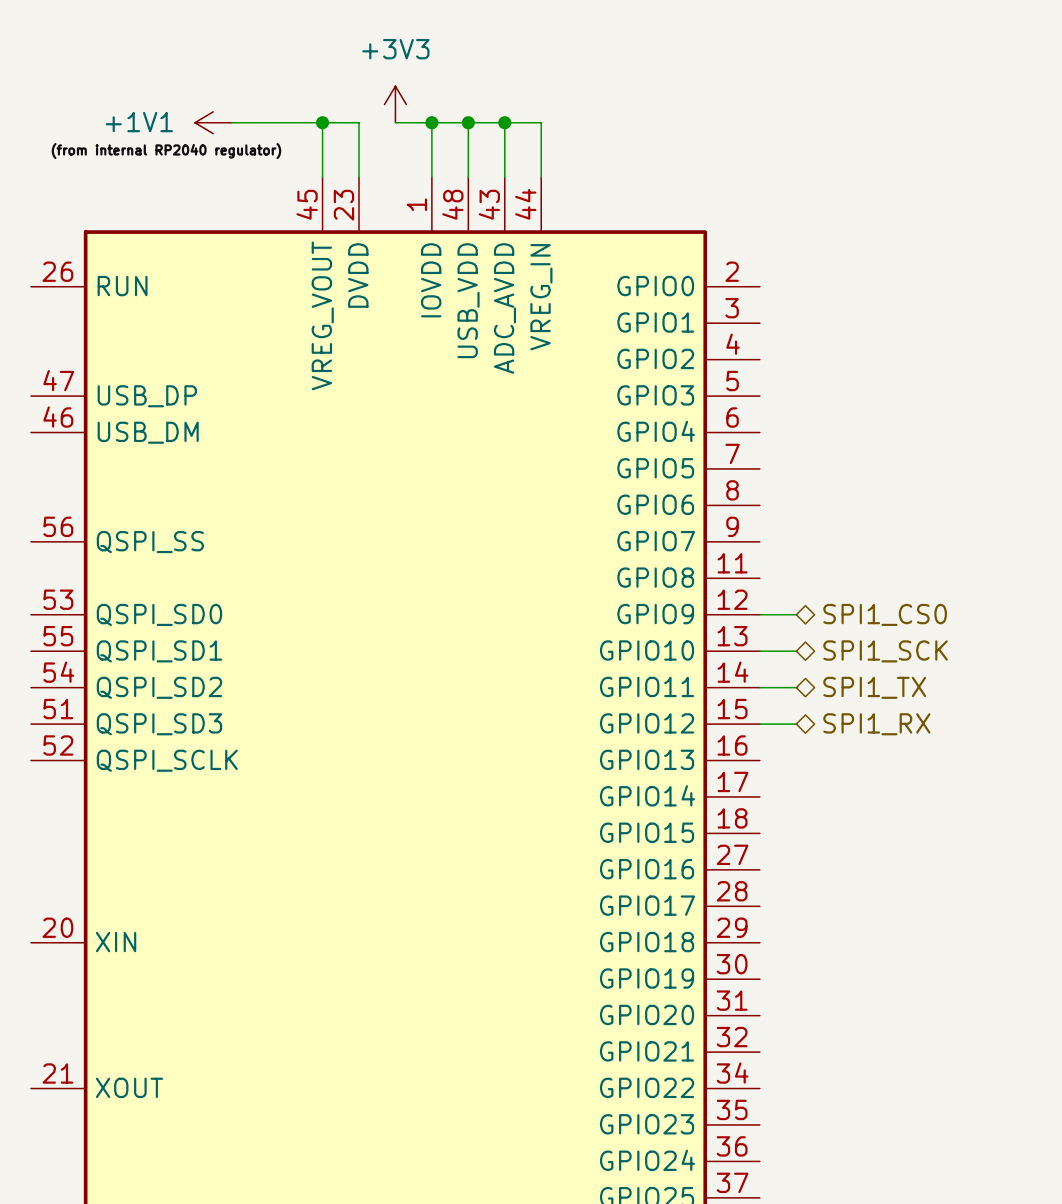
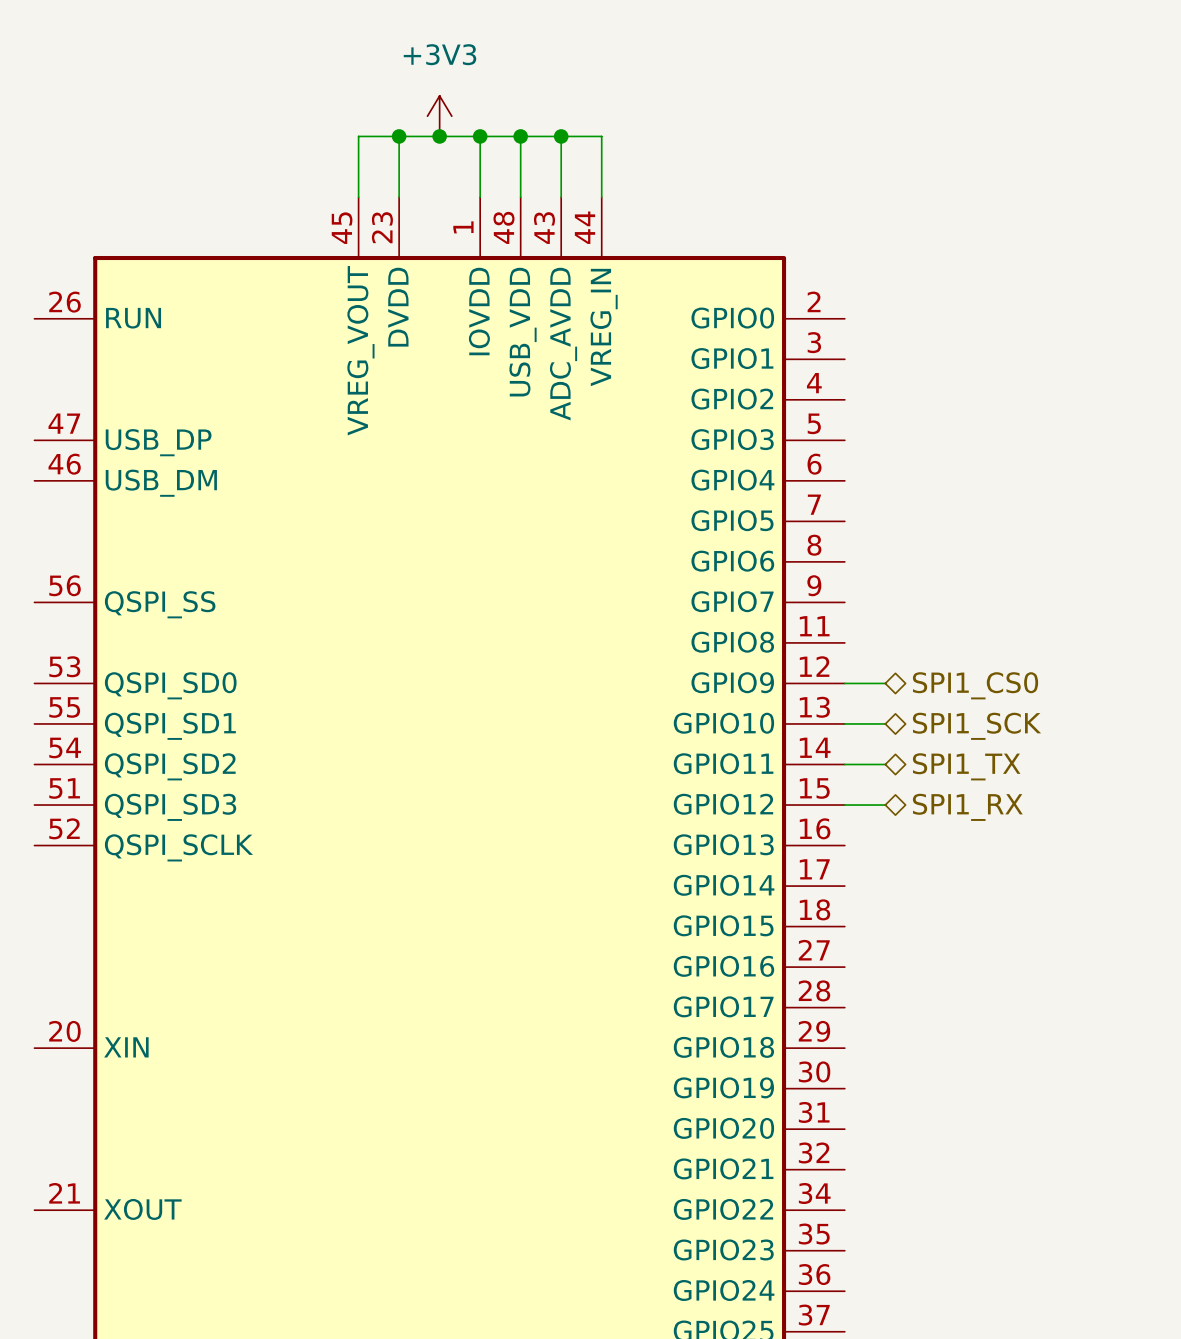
power symbol: +1V1 (213, 122) -> none
wire: (231, 122) (322, 122) -> none
junction: (322, 122) -> none
wire: none -> (399, 136) (439, 136)
junction: none -> (399, 136)
junction: none -> (439, 136)
label: (from internal RP2040 regulator) (166, 151) -> none

